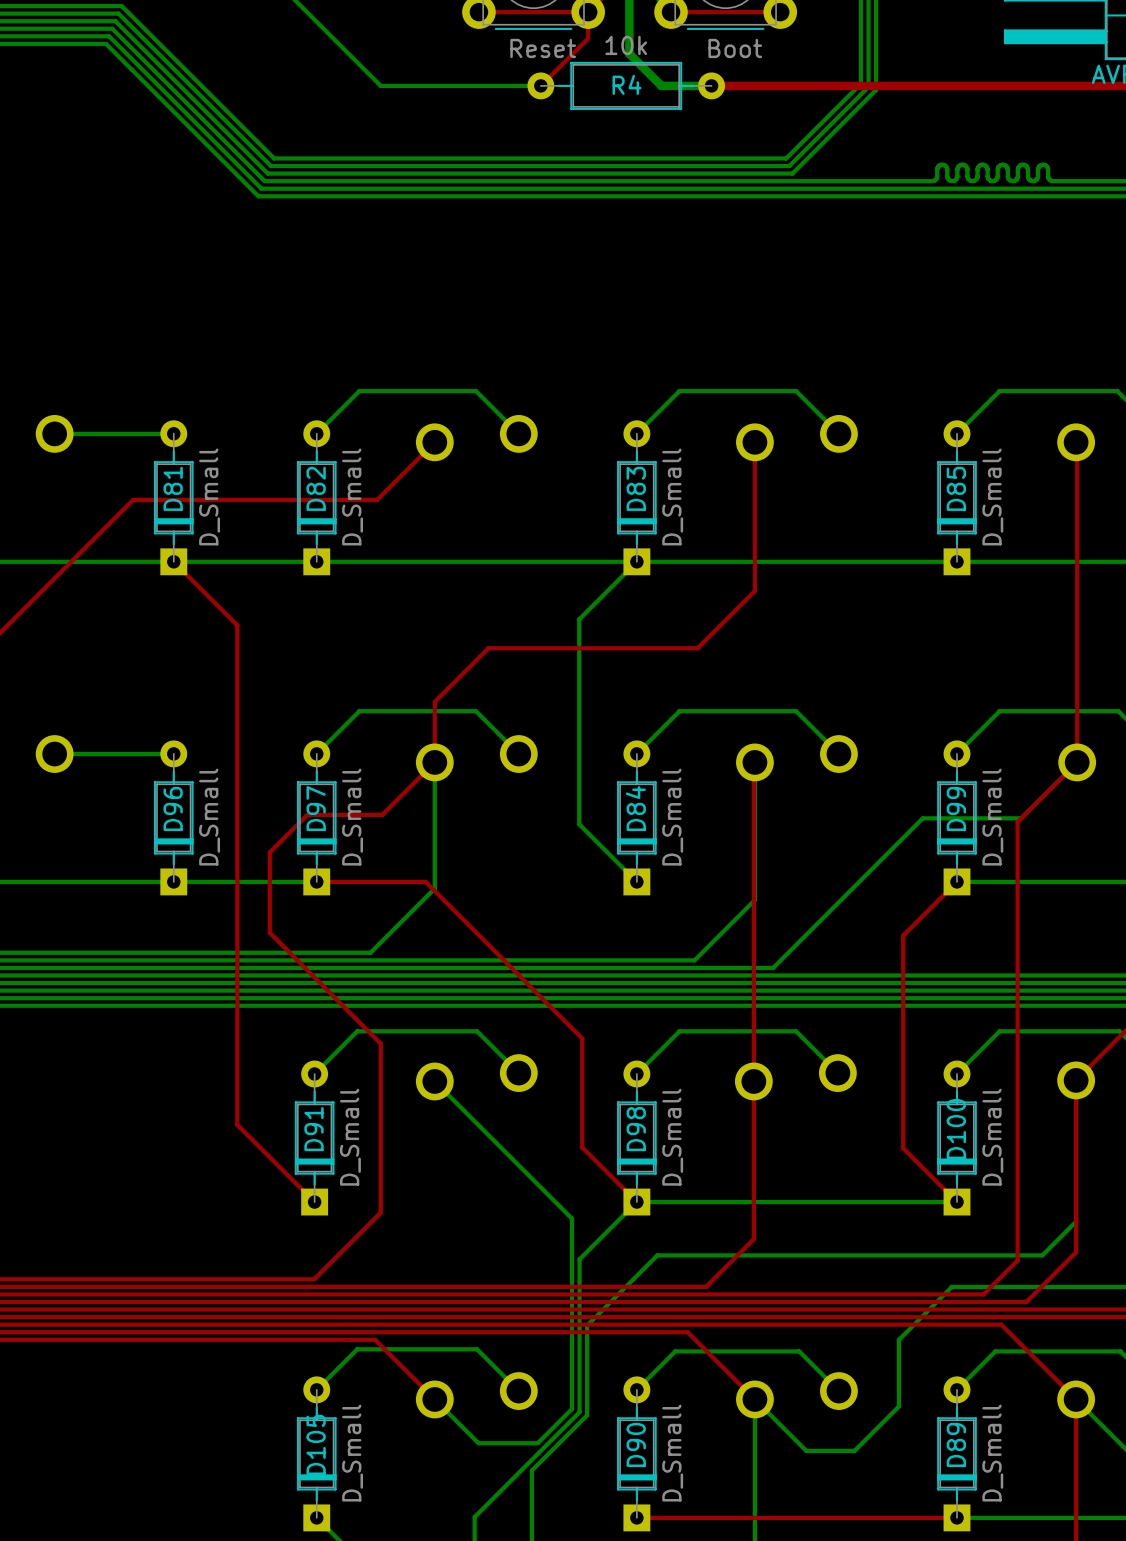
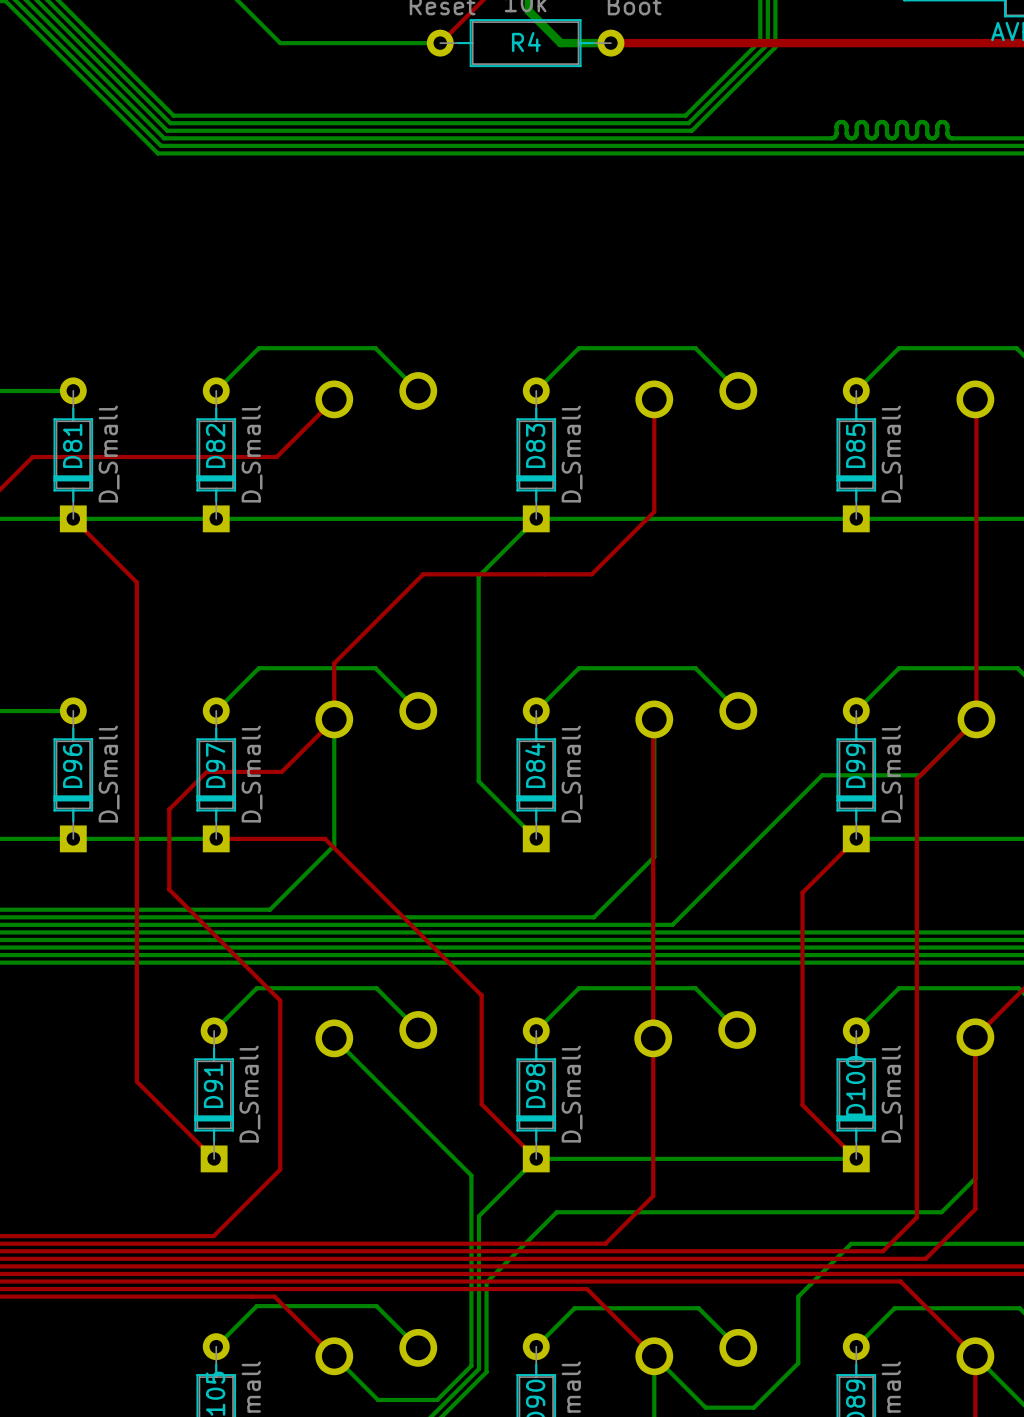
top track: (754, 554) (754, 591) (697, 648) (488, 648) (434, 701) (434, 706) -> (654, 511) (591, 574) (423, 574) (334, 663)

